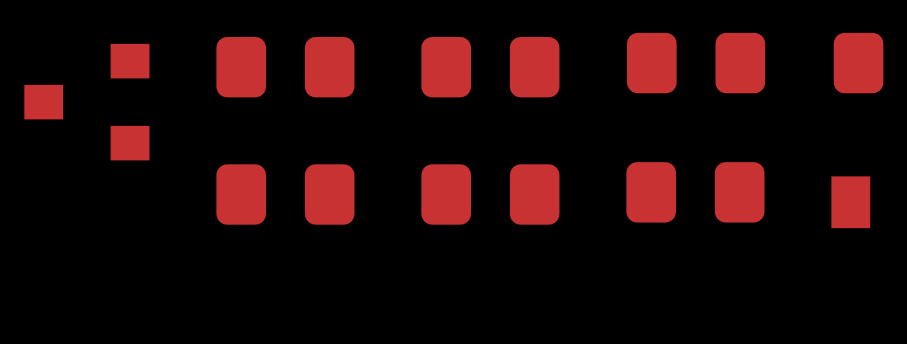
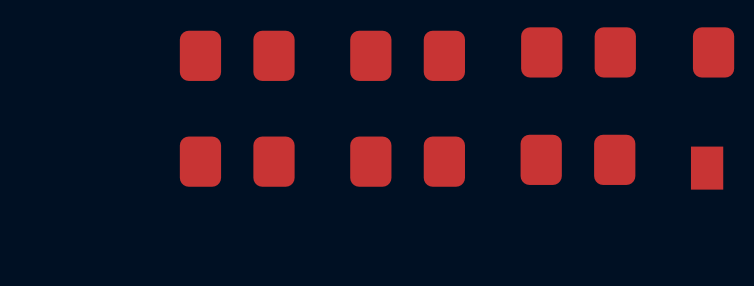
part: (86, 102) -> none

